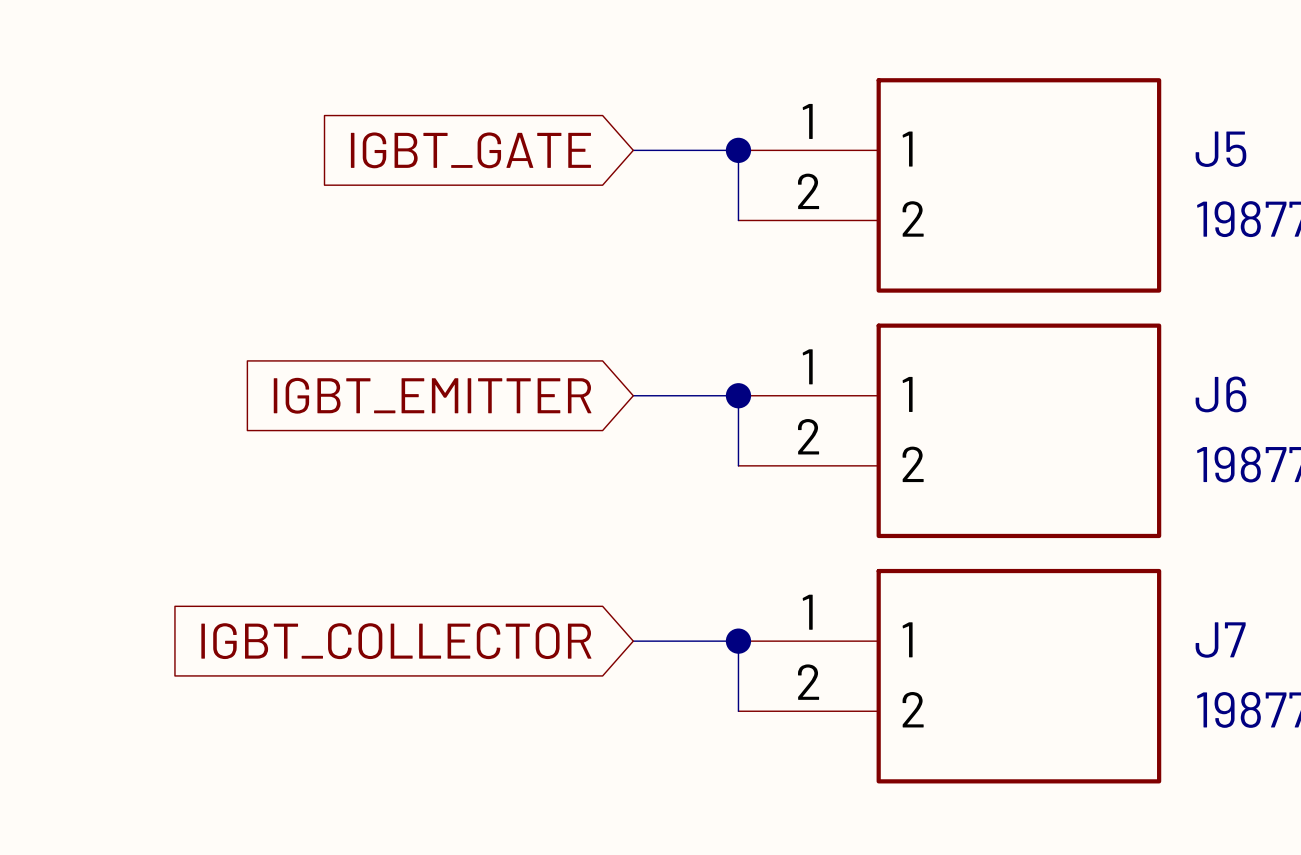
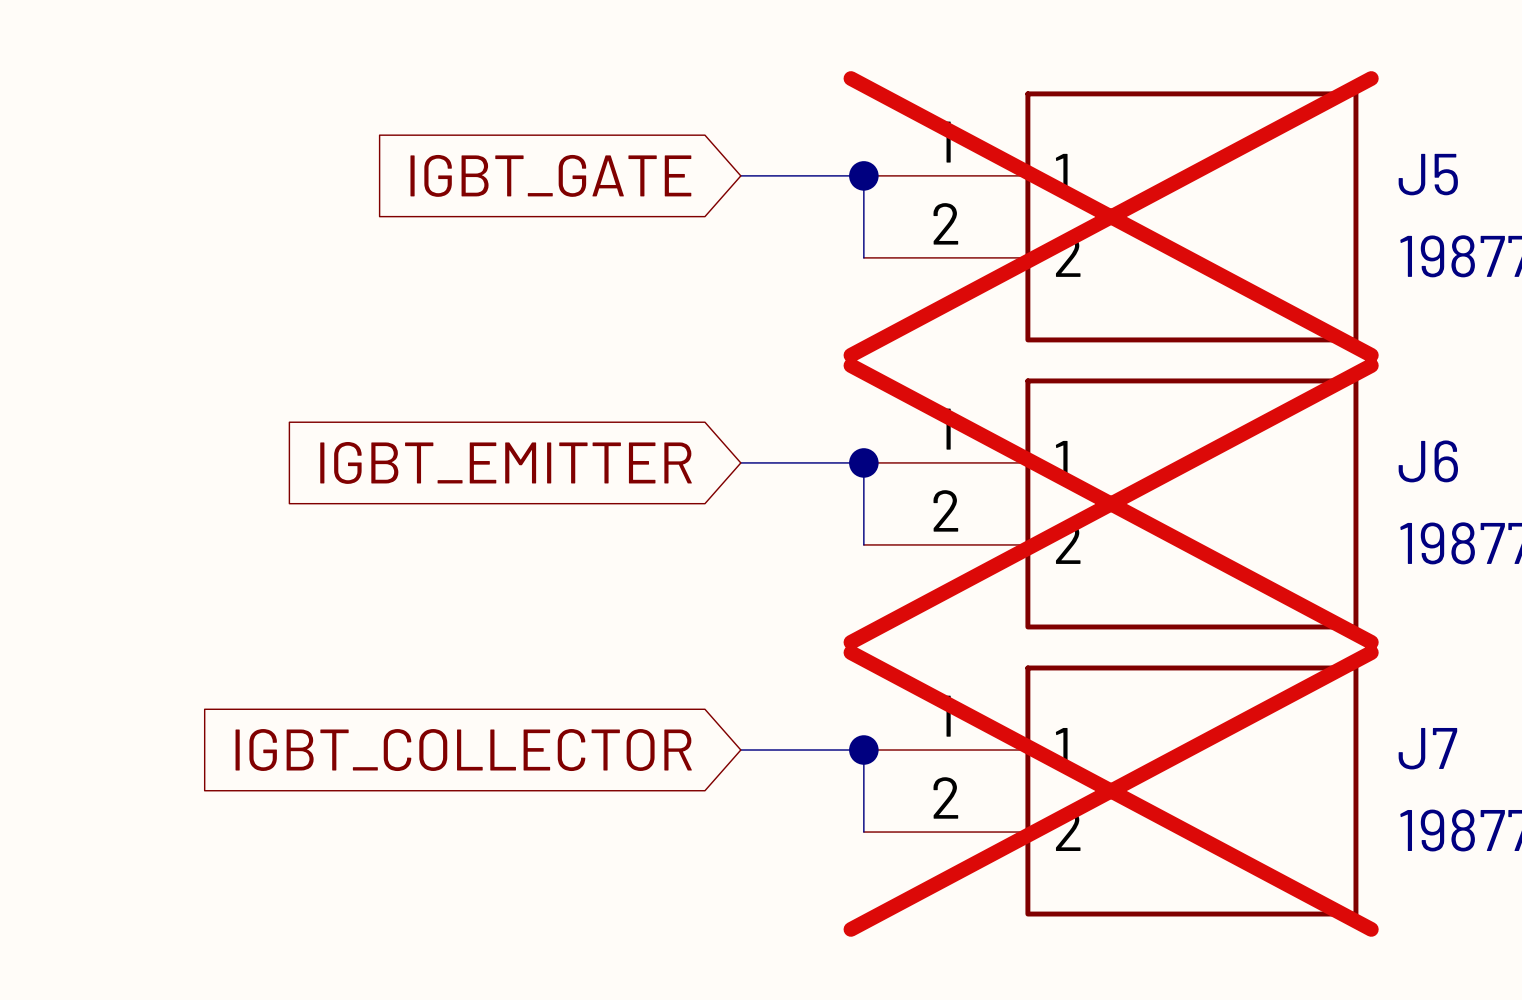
J5 do-not-place cross: none -> (1111, 216)
J6 do-not-place cross: none -> (1111, 503)
J7 do-not-place cross: none -> (1111, 791)

